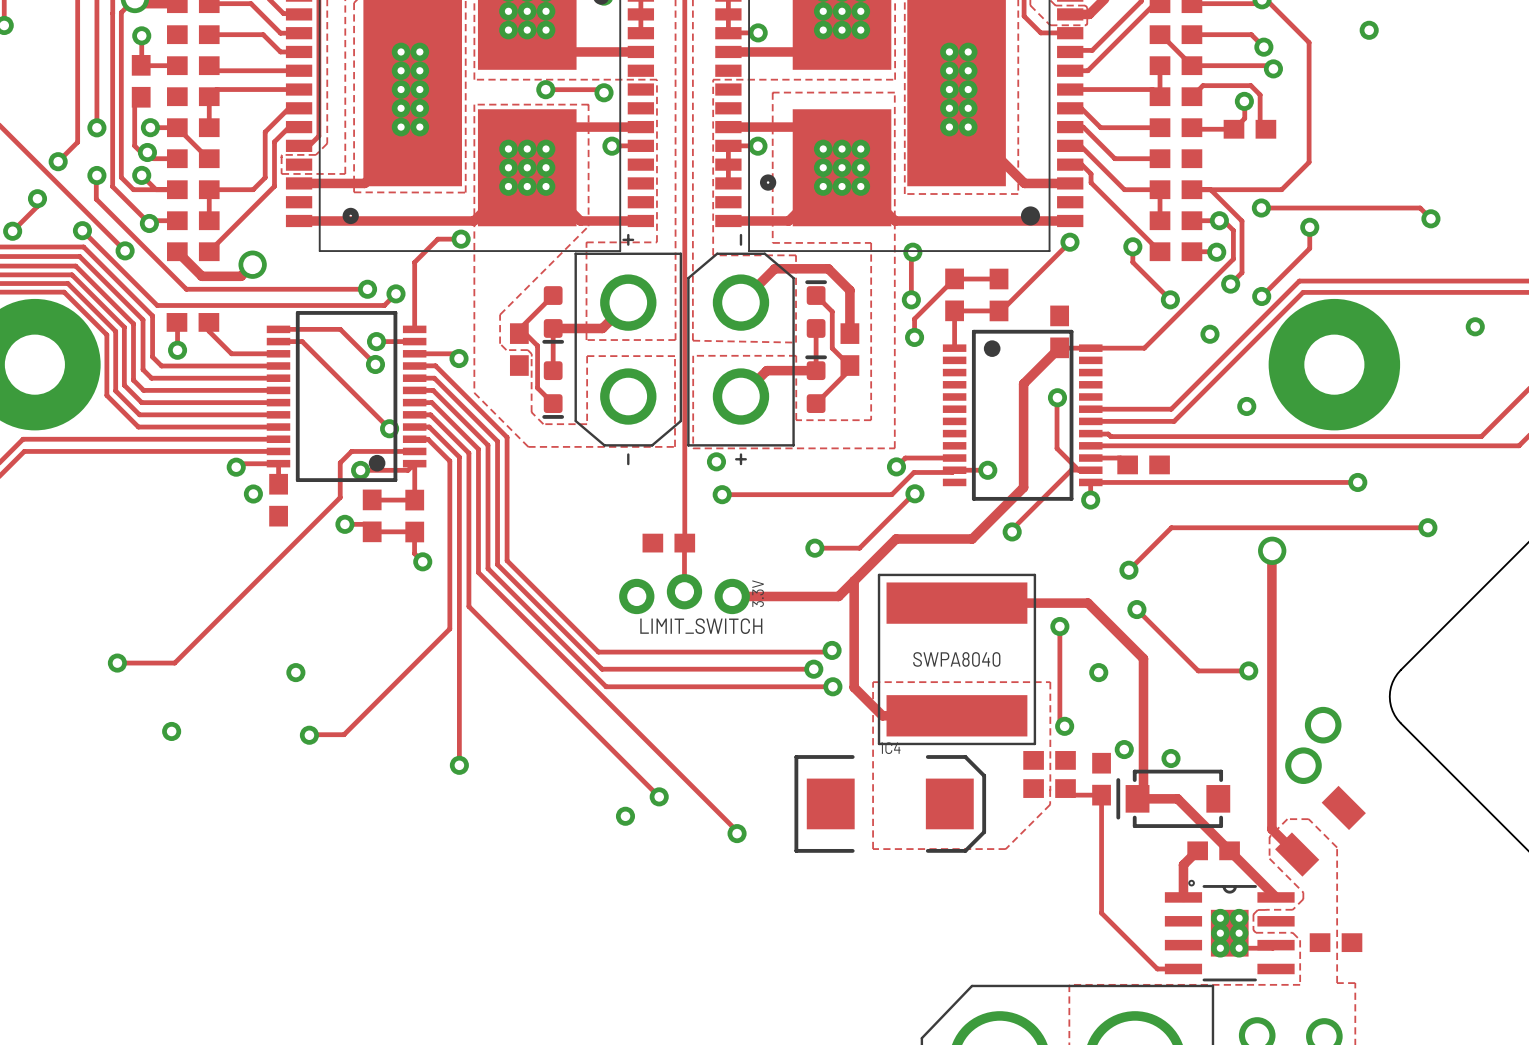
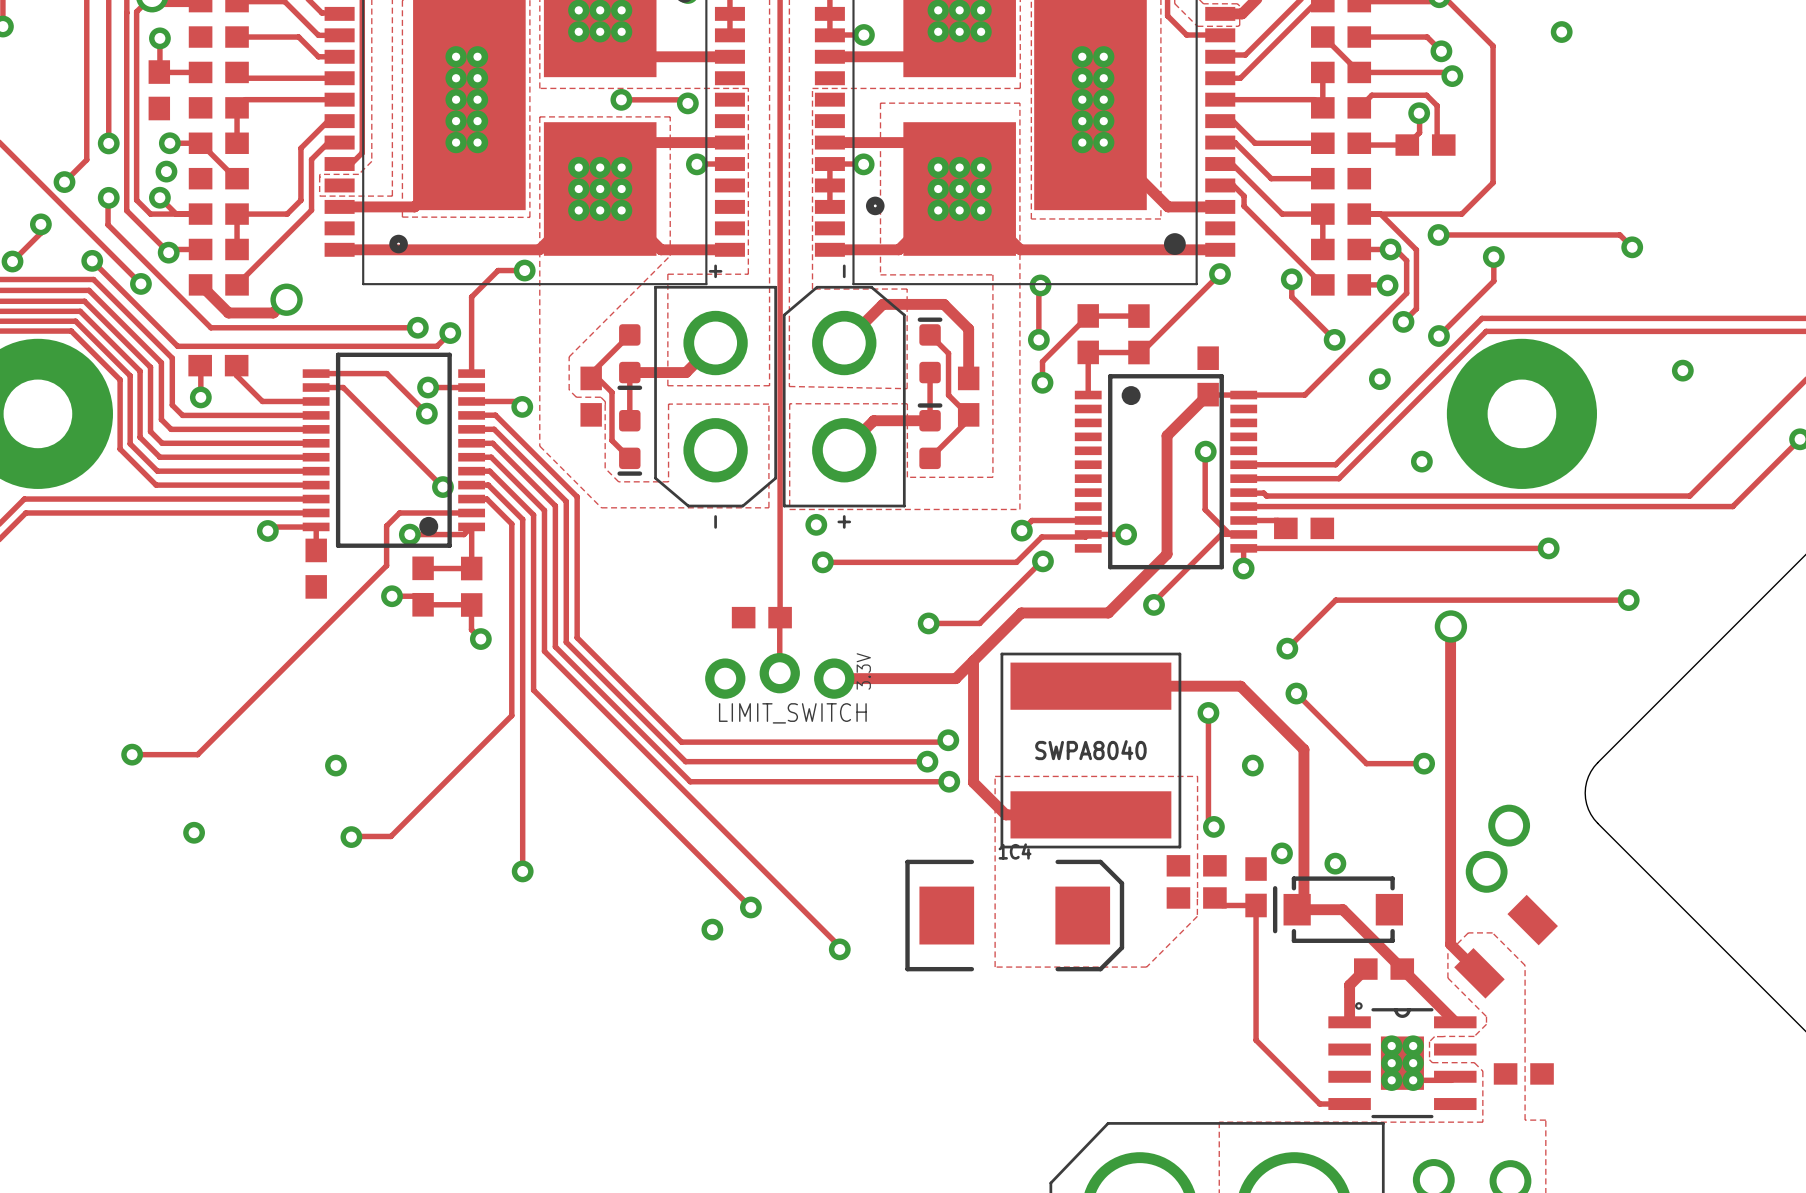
track: (141, 97) (134, 103) (134, 145) (141, 152) (147, 152) (153, 158) (177, 158) -> none
via: (253, 494) -> none

